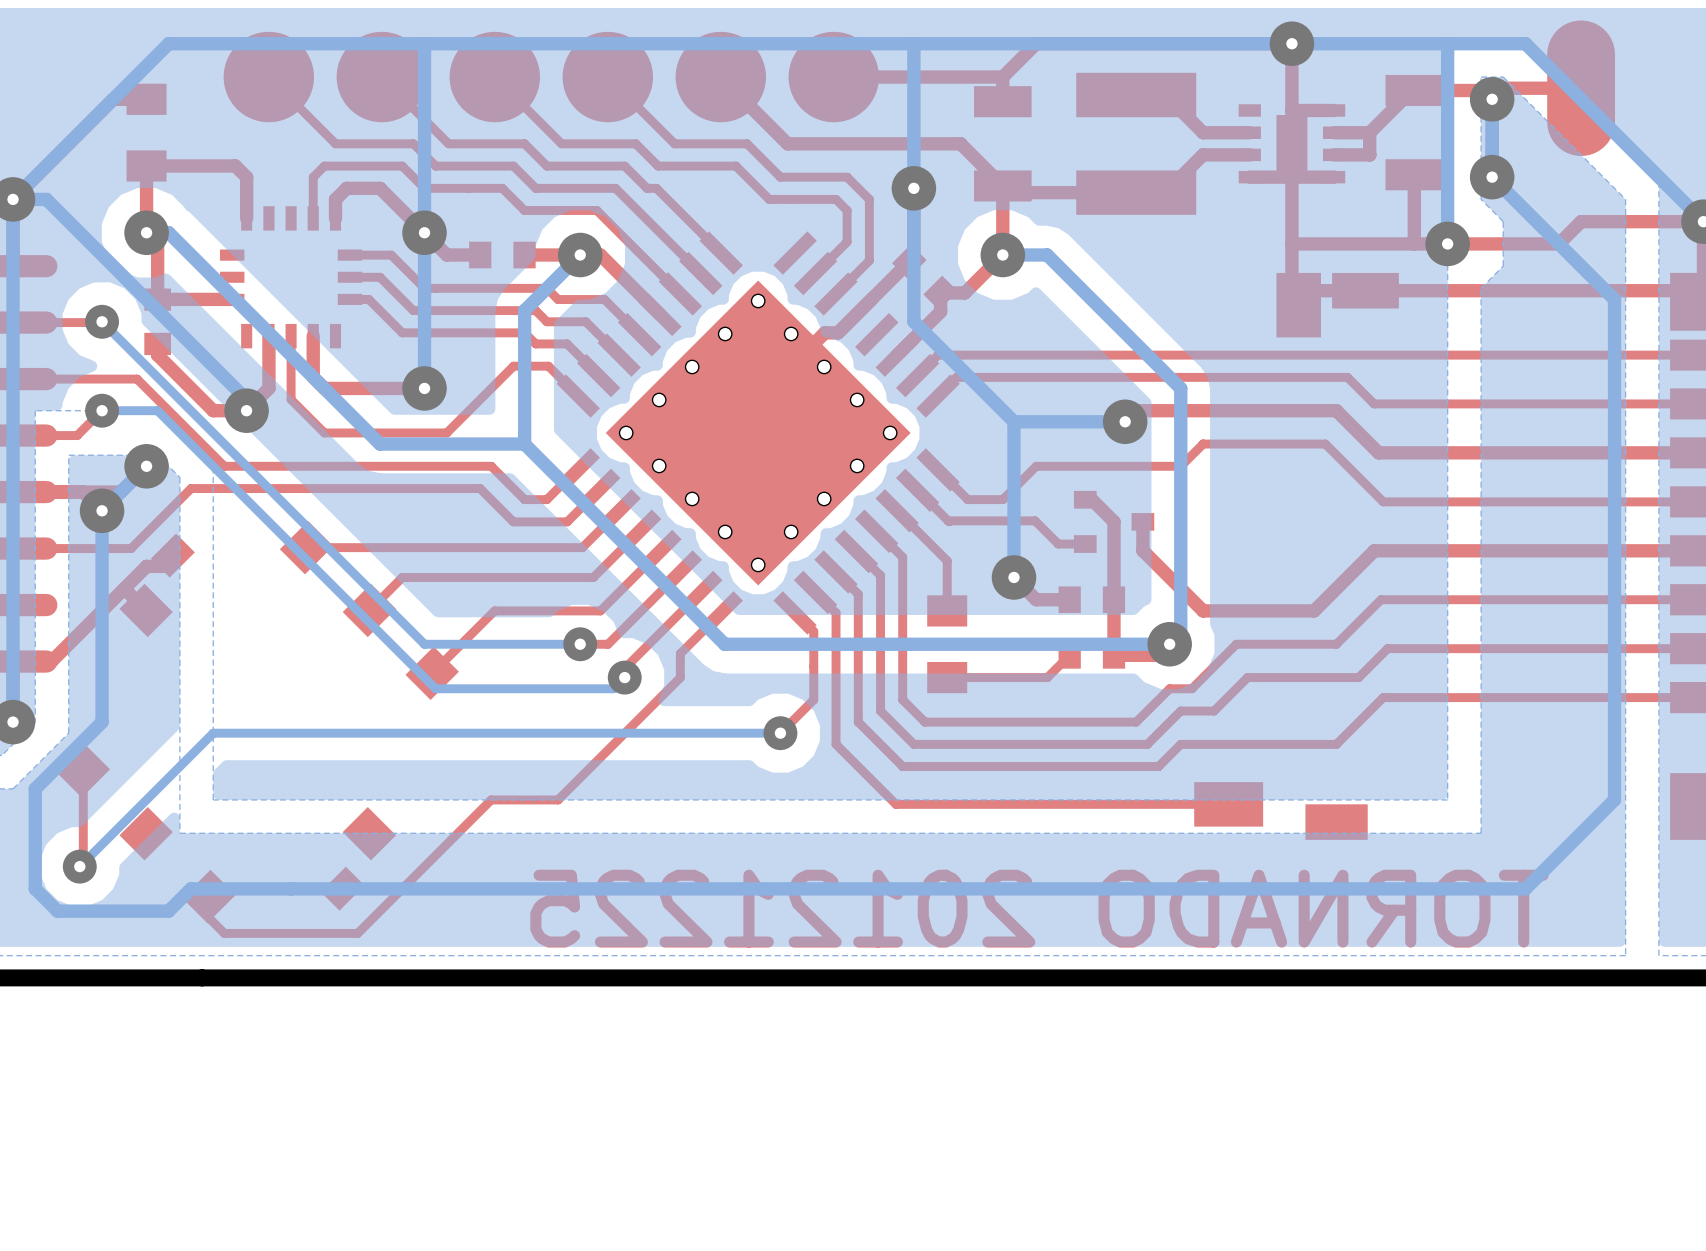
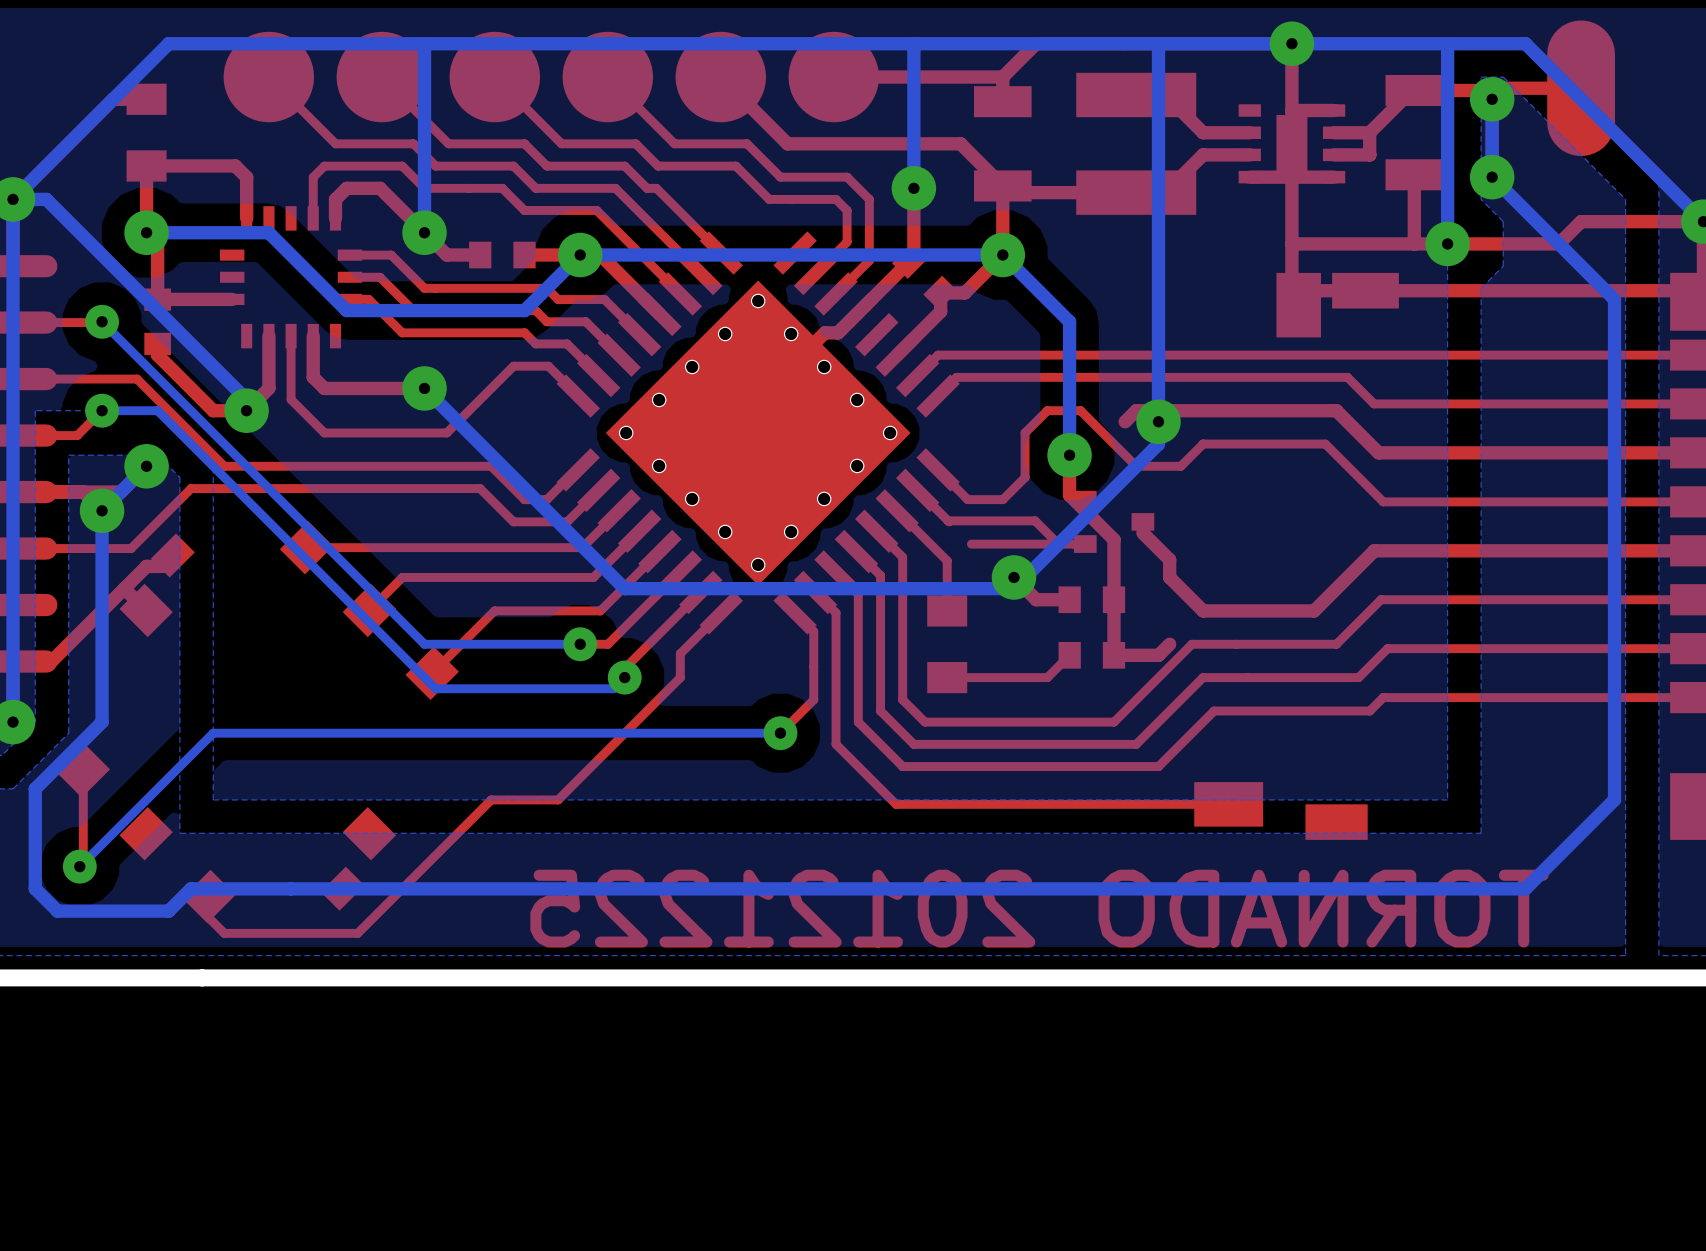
bottom track: (913, 188) (913, 321) (1013, 421) -> none
bottom track: (168, 232) (380, 444) (524, 444) -> (168, 232) (268, 232) (346, 310) (524, 310)
bottom track: (424, 232) (424, 388) -> (1158, 43) (1158, 444) (1013, 588) (624, 588) (424, 388)
bottom track: none -> (580, 255) (1002, 255) (1069, 321) (1069, 455)
bottom track: (1002, 255) (1047, 255) (1180, 388) (1180, 633) (1169, 644) (724, 644) (524, 444) -> none
bottom track: (524, 310) (524, 444) -> none
bottom track: (1013, 421) (1013, 577) -> none
bottom track: (1125, 421) (1013, 421) -> none
via position: (1125, 421) -> (1158, 421)
via: none -> (1069, 455)
top track: (1136, 466) (1036, 466) (1025, 477) -> (1136, 466) (1080, 410) (1047, 410) (1025, 432) (1025, 477)
top track: (1085, 499) (1091, 499) (1113, 521) (1113, 539) -> (1069, 455) (1069, 495) (1113, 539)
top track: (1142, 521) (1142, 550) (1169, 577) -> (1142, 533) (1169, 559) (1169, 577)
via: (1169, 644) -> none
top track: (1236, 644) (1191, 688) (1169, 688) (1136, 722) (1114, 722) -> (1236, 644) (1191, 644) (1114, 722)
top track: (1247, 677) (1214, 711) (1180, 711) (1147, 744) (1136, 744) -> (1247, 677) (1203, 677) (1136, 744)
top track: (1369, 711) (1336, 744) (1180, 744) -> (1369, 711) (1214, 711) (1180, 744)

